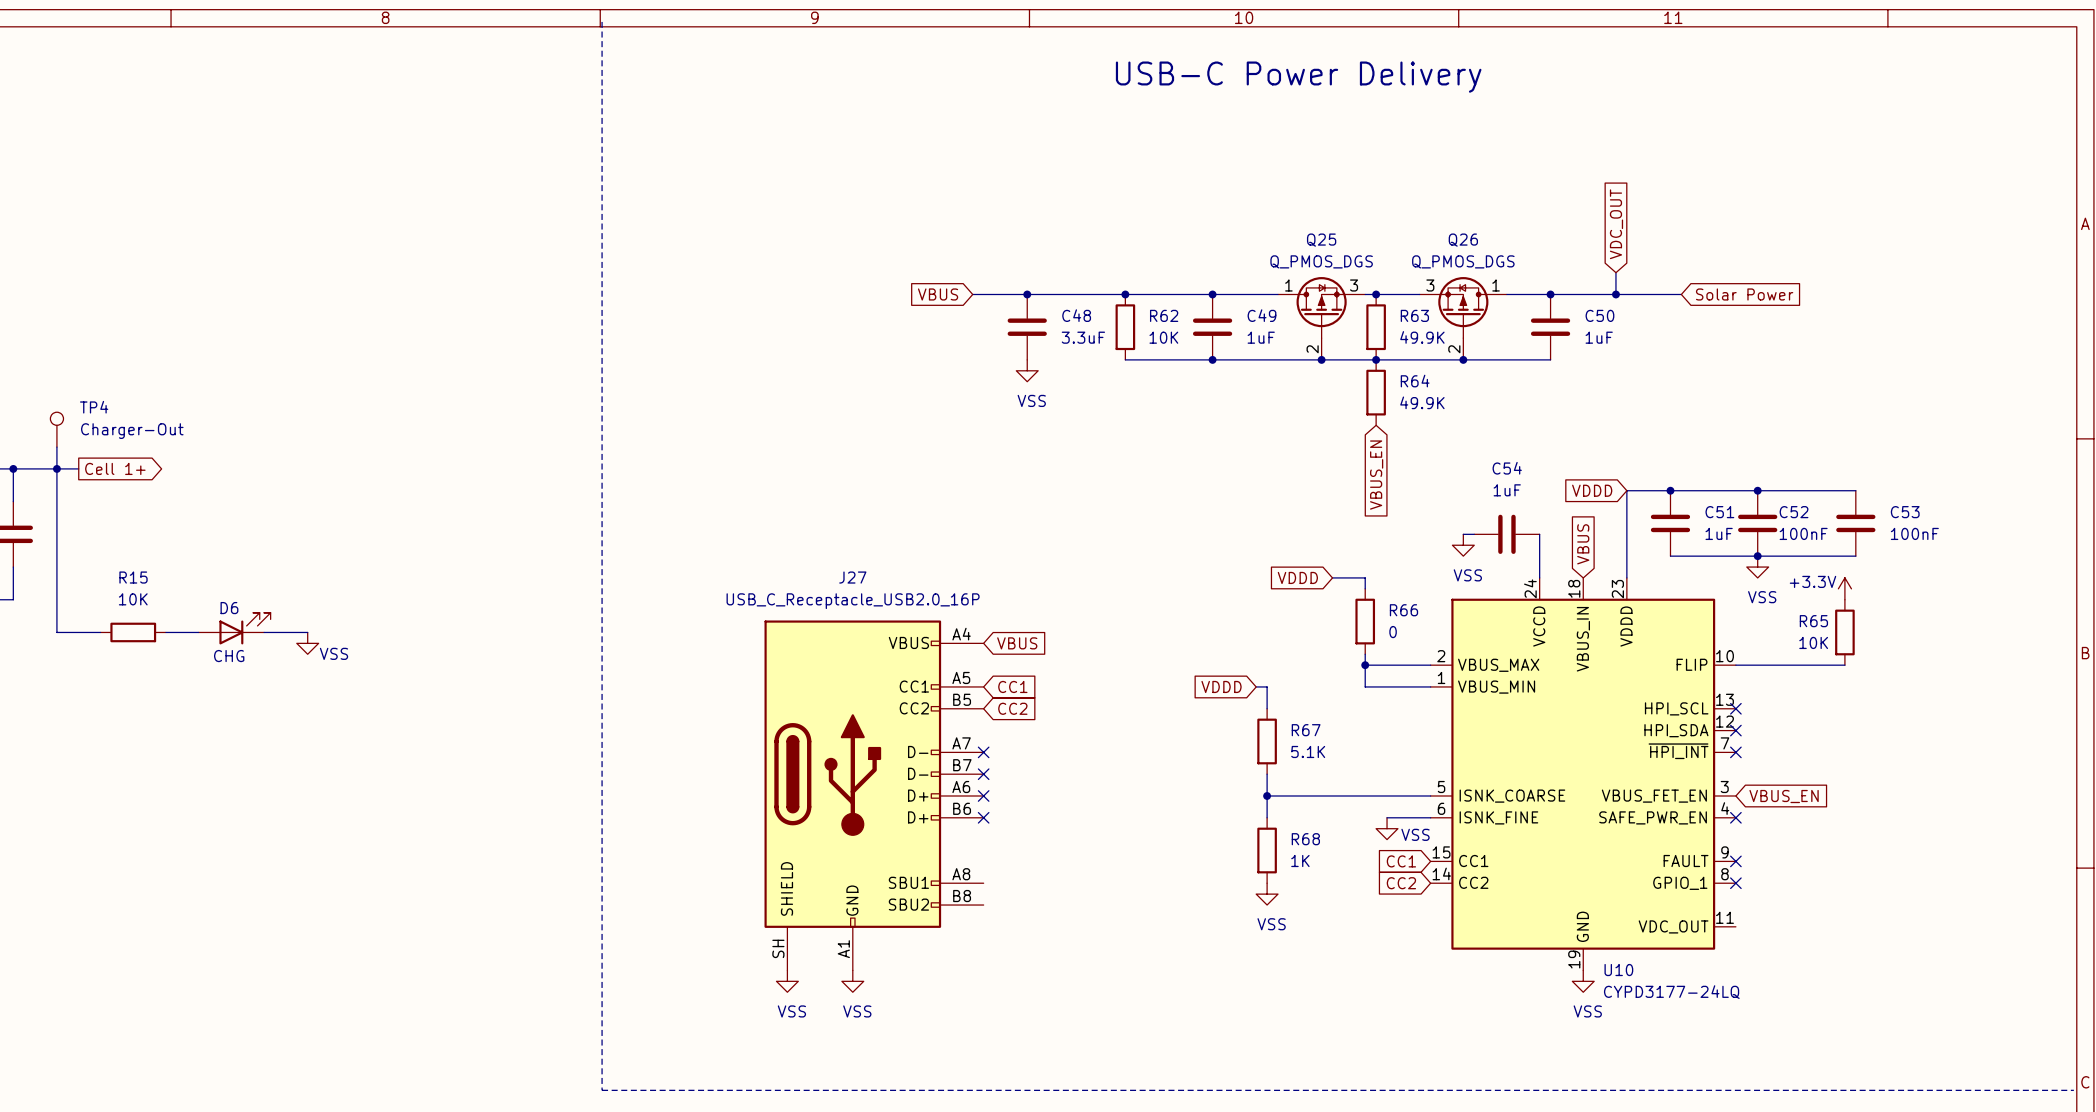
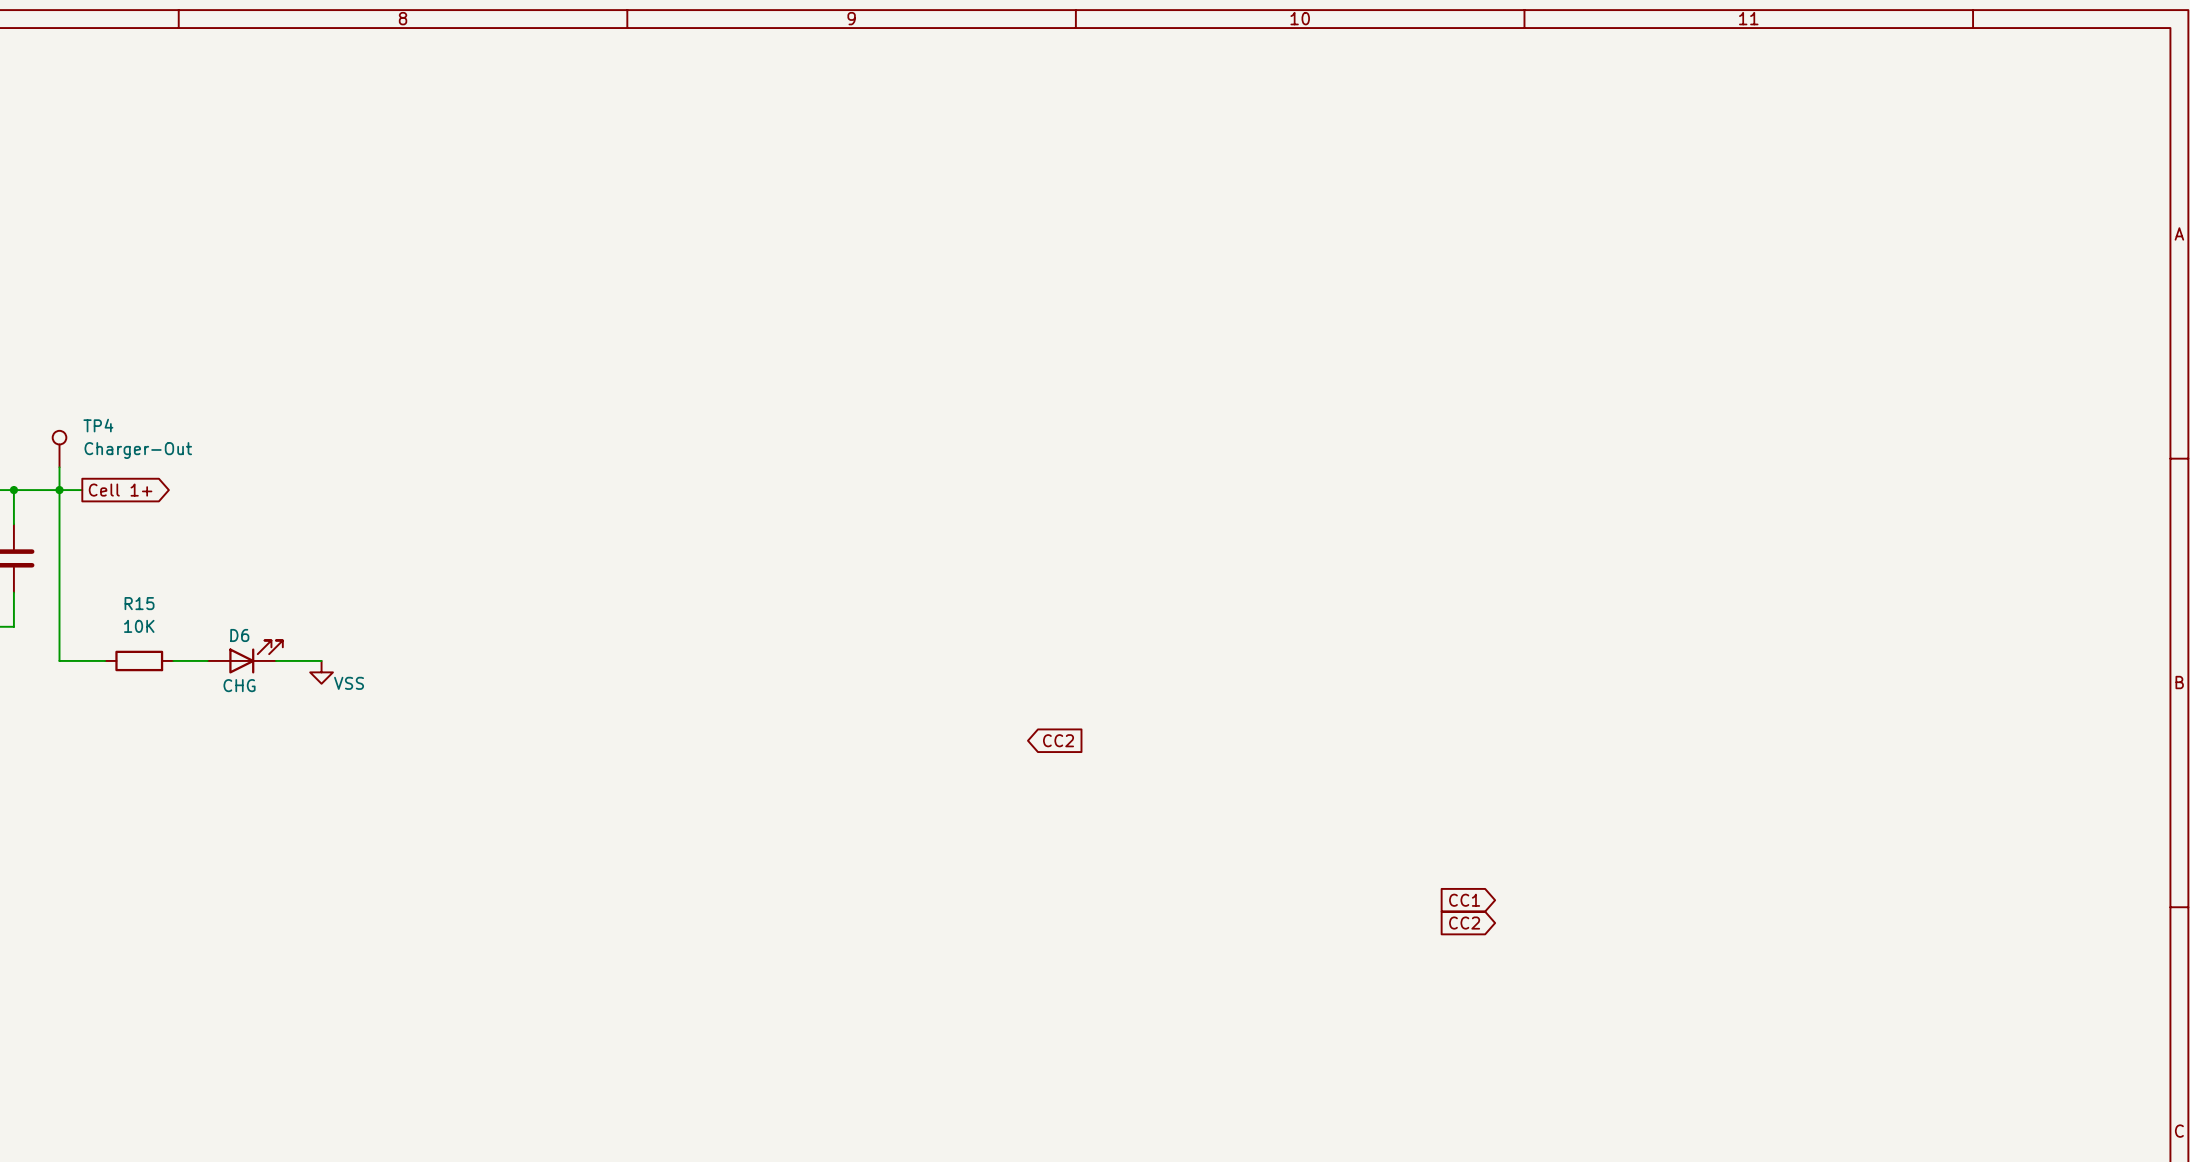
line: (602, 21) (602, 1090) (2073, 1090) -> none
text: USB-C Power Delivery (1298, 77) -> none
global label: VDC_OUT (1616, 224) -> none
wire: (1615, 272) (1615, 294) -> none
global label: VBUS (938, 294) -> none
wire: (972, 294) (1278, 294) -> none
junction: (1027, 294) -> none
junction: (1125, 294) -> none
junction: (1212, 294) -> none
wire: (1365, 294) (1419, 294) -> none
junction: (1376, 294) -> none
wire: (1506, 294) (1681, 294) -> none
junction: (1550, 294) -> none
junction: (1615, 294) -> none
global label: Solar Power (1744, 294) -> none
Q25: Q_PMOS_DGS (1321, 318) -> none
Q26: Q_PMOS_DGS (1463, 318) -> none
C48: 3.3uF (1027, 327) -> none
R62: 10K (1125, 327) -> none
C49: 1uF (1212, 327) -> none
R63: 49.9K (1376, 327) -> none
C50: 1uF (1550, 327) -> none
wire: (1125, 359) (1550, 359) -> none
junction: (1212, 359) -> none
junction: (1321, 359) -> none
junction: (1376, 359) -> none
junction: (1463, 359) -> none
power symbol: VSS (1027, 370) -> none
R64: 49.9K (1376, 392) -> none
global label: VBUS_EN (1376, 475) -> none
global label: VDDD (1592, 490) -> none
junction: (1670, 490) -> none
junction: (1757, 490) -> none
wire: (1855, 490) (1626, 490) (1626, 577) -> none
C51: 1uF (1670, 523) -> none
C52: 100nF (1757, 523) -> none
C53: 100nF (1855, 523) -> none
wire: (1463, 534) (1474, 534) -> none
C54: 1uF (1506, 534) -> none
wire: (1539, 534) (1539, 577) -> none
global label: VBUS (1583, 544) -> none
power symbol: VSS (1463, 545) -> none
wire: (1670, 556) (1855, 556) -> none
junction: (1757, 556) -> none
power symbol: VSS (1757, 567) -> none
global label: VDDD (1297, 577) -> none
wire: (1332, 577) (1365, 577) (1365, 588) -> none
power symbol: +3.3V (1844, 588) -> none
R66: 0 (1365, 621) -> none
R65: 10K (1844, 632) -> none
global label: VBUS (1017, 643) -> none
wire: (1365, 654) (1365, 686) (1430, 686) -> none
wire: (1365, 665) (1430, 665) -> none
junction: (1365, 665) -> none
wire: (1735, 665) (1844, 665) -> none
global label: CC1 (1012, 686) -> none
global label: VDDD (1221, 686) -> none
wire: (1256, 686) (1267, 686) (1267, 708) -> none
no-connect mark: (1735, 708) -> none
no-connect mark: (1735, 730) -> none
R67: 5.1K (1267, 741) -> none
no-connect mark: (983, 752) -> none
no-connect mark: (1735, 752) -> none
no-connect mark: (983, 774) -> none
wire: (1267, 774) (1267, 817) -> none
U10: CYPD3177-24LQ (1583, 774) -> none
J27: USB_C_Receptacle_USB2.0_16P (874, 795) -> none
no-connect mark: (983, 795) -> none
wire: (1267, 795) (1430, 795) -> none
junction: (1267, 795) -> none
global label: VBUS_EN (1784, 796) -> none
no-connect mark: (983, 817) -> none
wire: (1387, 817) (1430, 817) -> none
no-connect mark: (1735, 817) -> none
power symbol: VSS (1387, 828) -> none
R68: 1K (1267, 850) -> none
no-connect mark: (1735, 861) -> none
no-connect mark: (1735, 883) -> none
power symbol: VSS (1267, 894) -> none
power symbol: VSS (787, 981) -> none
power symbol: VSS (852, 981) -> none
power symbol: VSS (1583, 981) -> none

